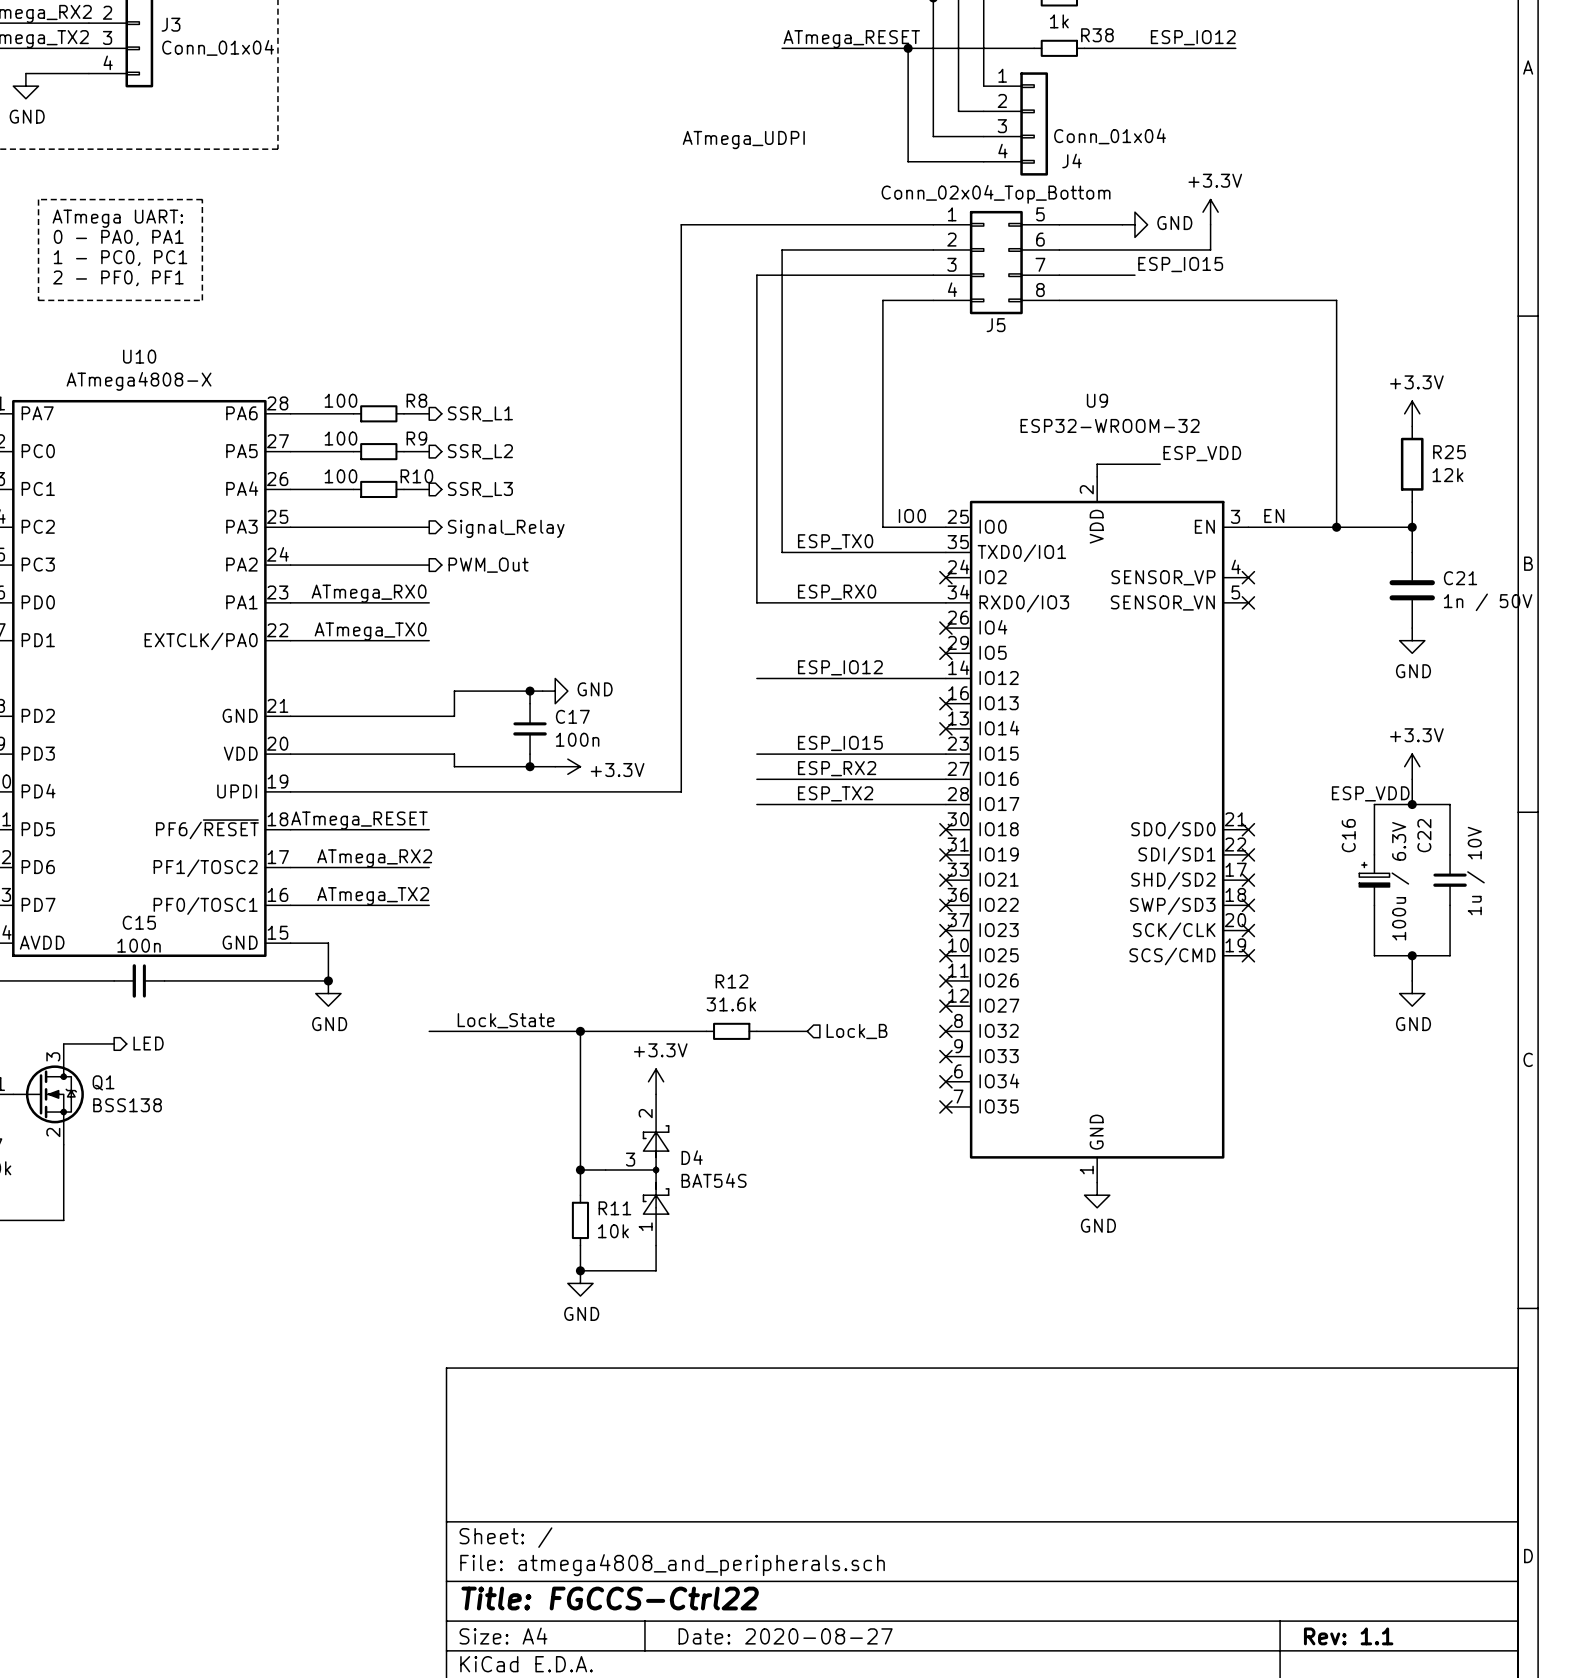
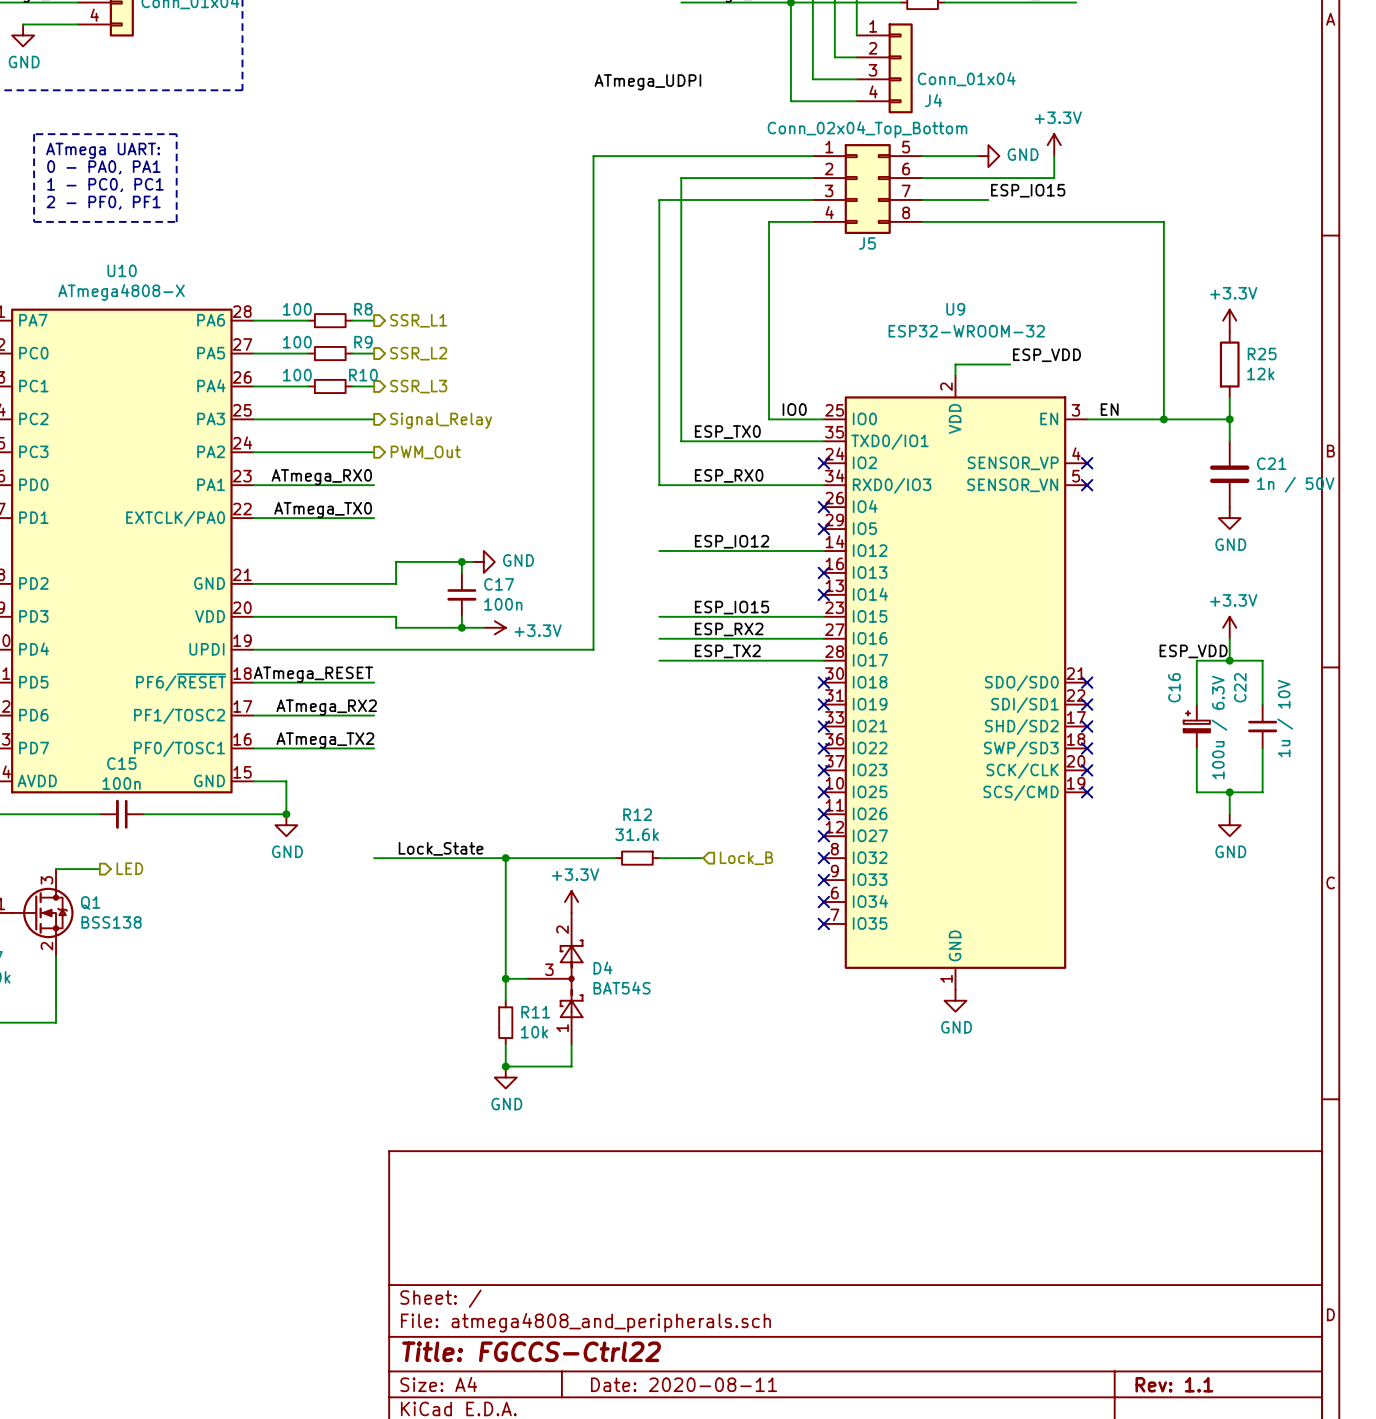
title block: Date: 2020-08-27 (785, 1636) -> Date: 2020-08-11 (684, 1384)

